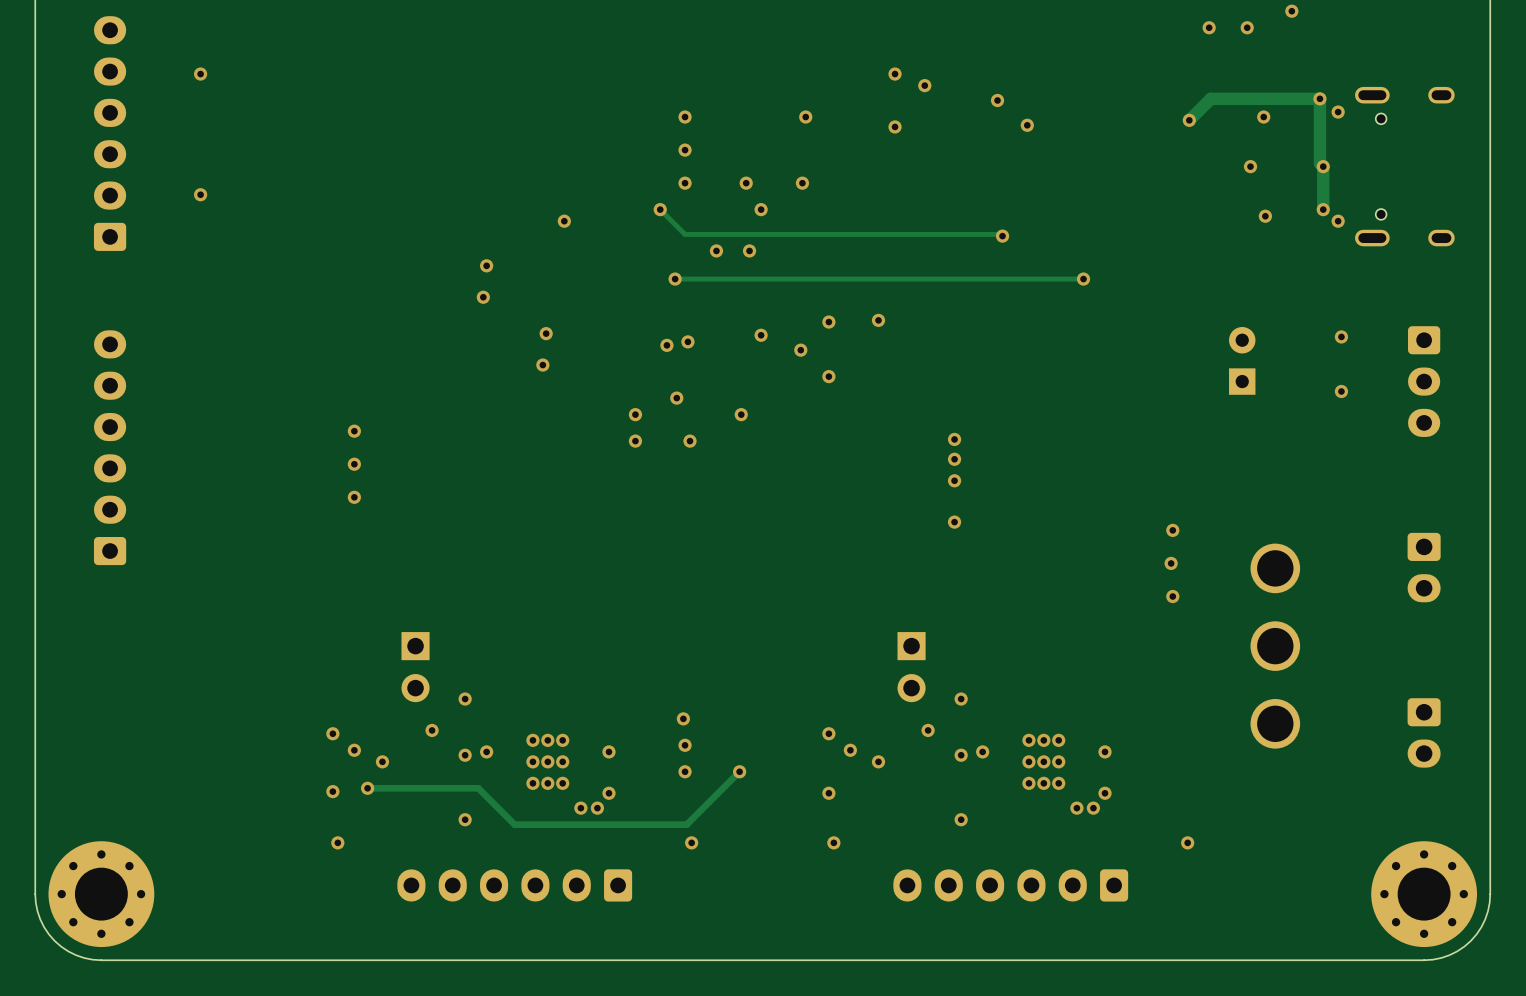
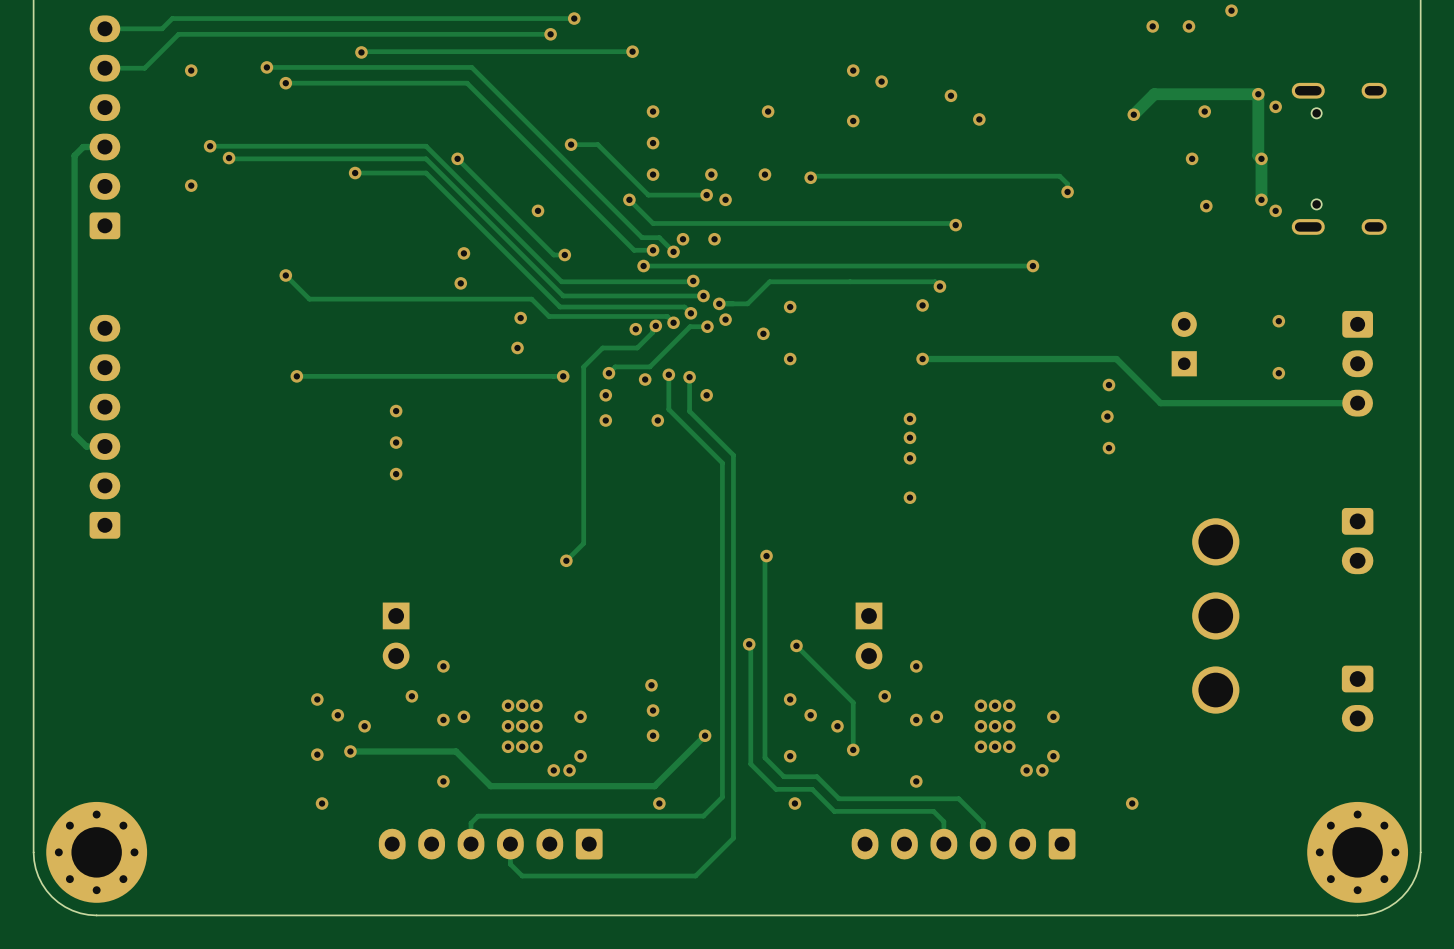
track: none -> (574, 18) (172, 18) (162, 28) (104, 28)
via: none -> (574, 18)
track: none -> (550, 34) (178, 34) (144, 68) (104, 68)
via: none -> (550, 34)
track: none -> (632, 51) (361, 52)
via: none -> (632, 51)
via: none -> (361, 52)
track: none -> (266, 67) (471, 67) (642, 237) (659, 237) (673, 251)
via: none -> (266, 67)
track: none -> (285, 83) (467, 83) (634, 250) (653, 250)
via: none -> (285, 83)
track: none -> (571, 144) (597, 144) (648, 195) (706, 195)
via: none -> (571, 144)
track: none -> (210, 146) (426, 146) (561, 281) (693, 281)
via: none -> (210, 146)
track: none -> (104, 147) (83, 147) (74, 155) (74, 434) (86, 446) (104, 446)
track: none -> (229, 158) (426, 158) (563, 295) (703, 295)
via: none -> (229, 158)
track: none -> (457, 158) (553, 254) (564, 254)
via: none -> (457, 158)
track: none -> (355, 173) (426, 173) (560, 307) (684, 307) (690, 313)
via: none -> (355, 173)
track: none -> (810, 177) (812, 176) (1059, 176) (1067, 184) (1067, 191)
via: none -> (810, 177)
via: none -> (1067, 191)
via: none -> (706, 195)
via: none -> (653, 250)
via: none -> (673, 251)
via: none -> (564, 254)
track: none -> (285, 275) (309, 299) (531, 299) (549, 316) (667, 316) (673, 322) (673, 325)
via: none -> (285, 275)
via: none -> (693, 281)
track: none -> (939, 286) (935, 281) (769, 281) (747, 303) (719, 303)
via: none -> (939, 286)
via: none -> (703, 295)
via: none -> (719, 303)
via: (878, 320) -> none
via: none -> (922, 305)
via: none -> (690, 313)
via: none -> (673, 322)
track: none -> (707, 326) (690, 326) (649, 366) (615, 366) (608, 373)
via: none -> (707, 326)
track: none -> (652, 330) (652, 332) (637, 347) (602, 347) (583, 366) (583, 543) (566, 560)
track: none -> (922, 359) (1116, 359) (1160, 403) (1357, 403)
via: none -> (922, 359)
via: none -> (608, 373)
track: none -> (668, 374) (668, 409) (722, 463) (722, 797) (703, 816) (478, 816) (471, 823) (471, 844)
via: none -> (668, 374)
via: none -> (296, 376)
track: none -> (563, 376) (296, 376)
via: none -> (563, 376)
track: none -> (689, 377) (689, 411) (733, 455) (733, 838) (695, 876) (522, 876) (510, 864) (510, 844)
via: none -> (689, 377)
via: none -> (1108, 385)
via: (354, 431) -> none
via: none -> (396, 411)
via: none -> (1107, 416)
via: (354, 464) -> none
via: none -> (396, 442)
via: none -> (1108, 448)
via: (354, 497) -> none
via: none -> (396, 474)
via: (1172, 530) -> none
via: (1171, 563) -> none
track: none -> (766, 556) (764, 557) (764, 757) (783, 776) (816, 776) (839, 798) (958, 798) (983, 823) (983, 844)
via: none -> (766, 556)
via: none -> (566, 560)
via: (1172, 596) -> none
track: none -> (749, 644) (750, 645) (750, 764) (776, 789) (812, 789) (834, 811) (933, 811) (943, 821) (943, 844)
via: none -> (749, 644)
track: none -> (796, 645) (853, 702) (853, 749)
via: none -> (796, 645)
via: none -> (853, 749)

